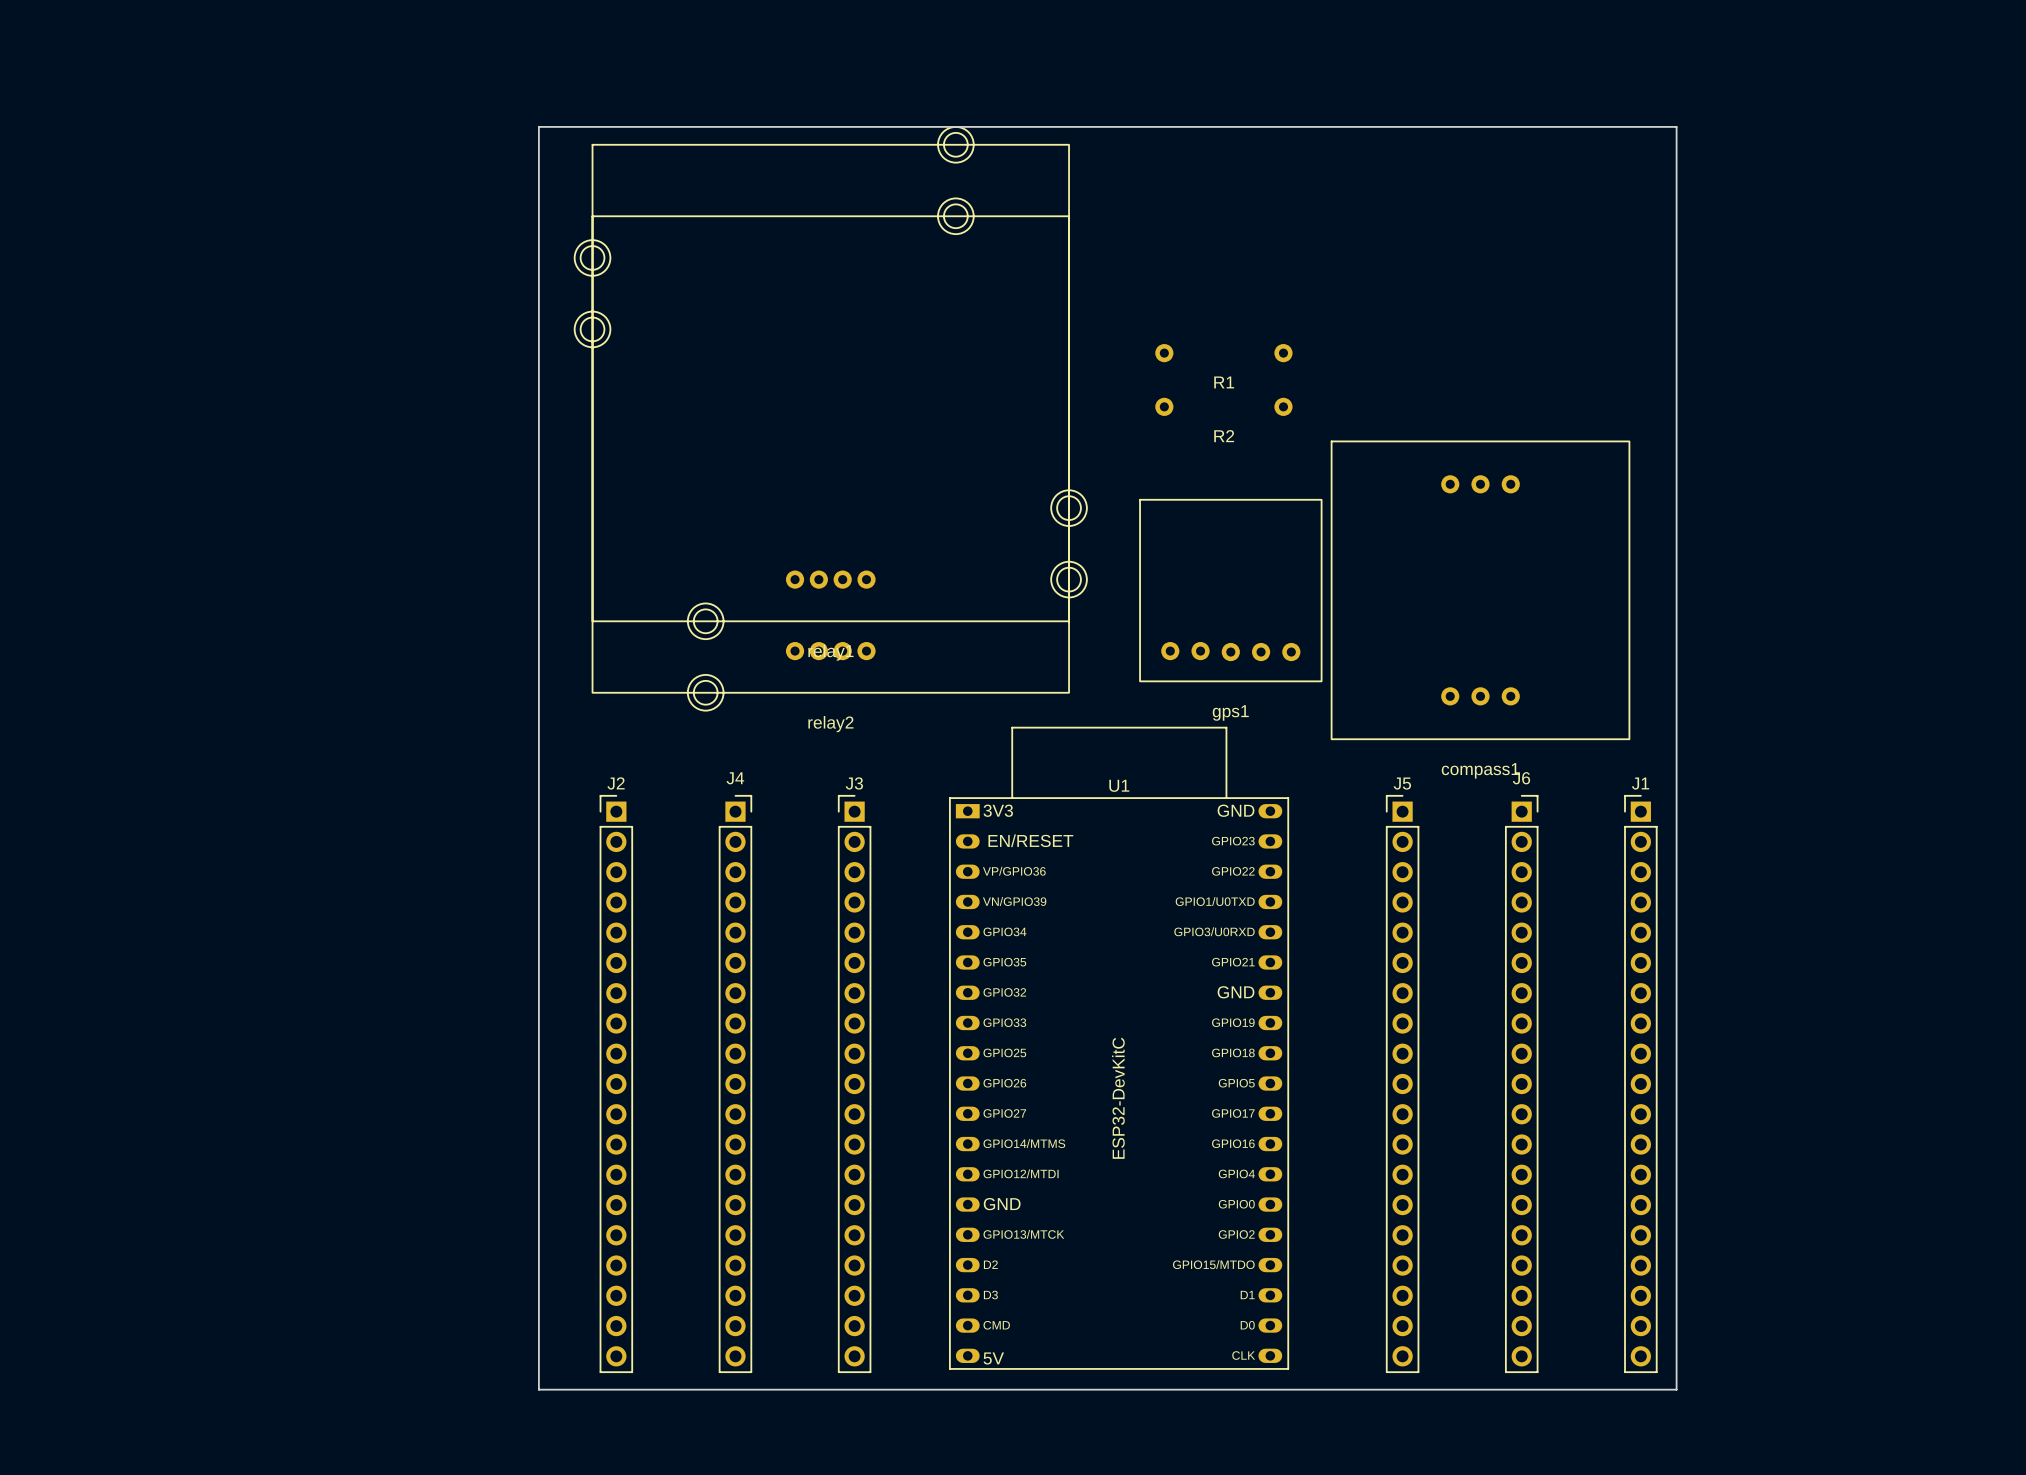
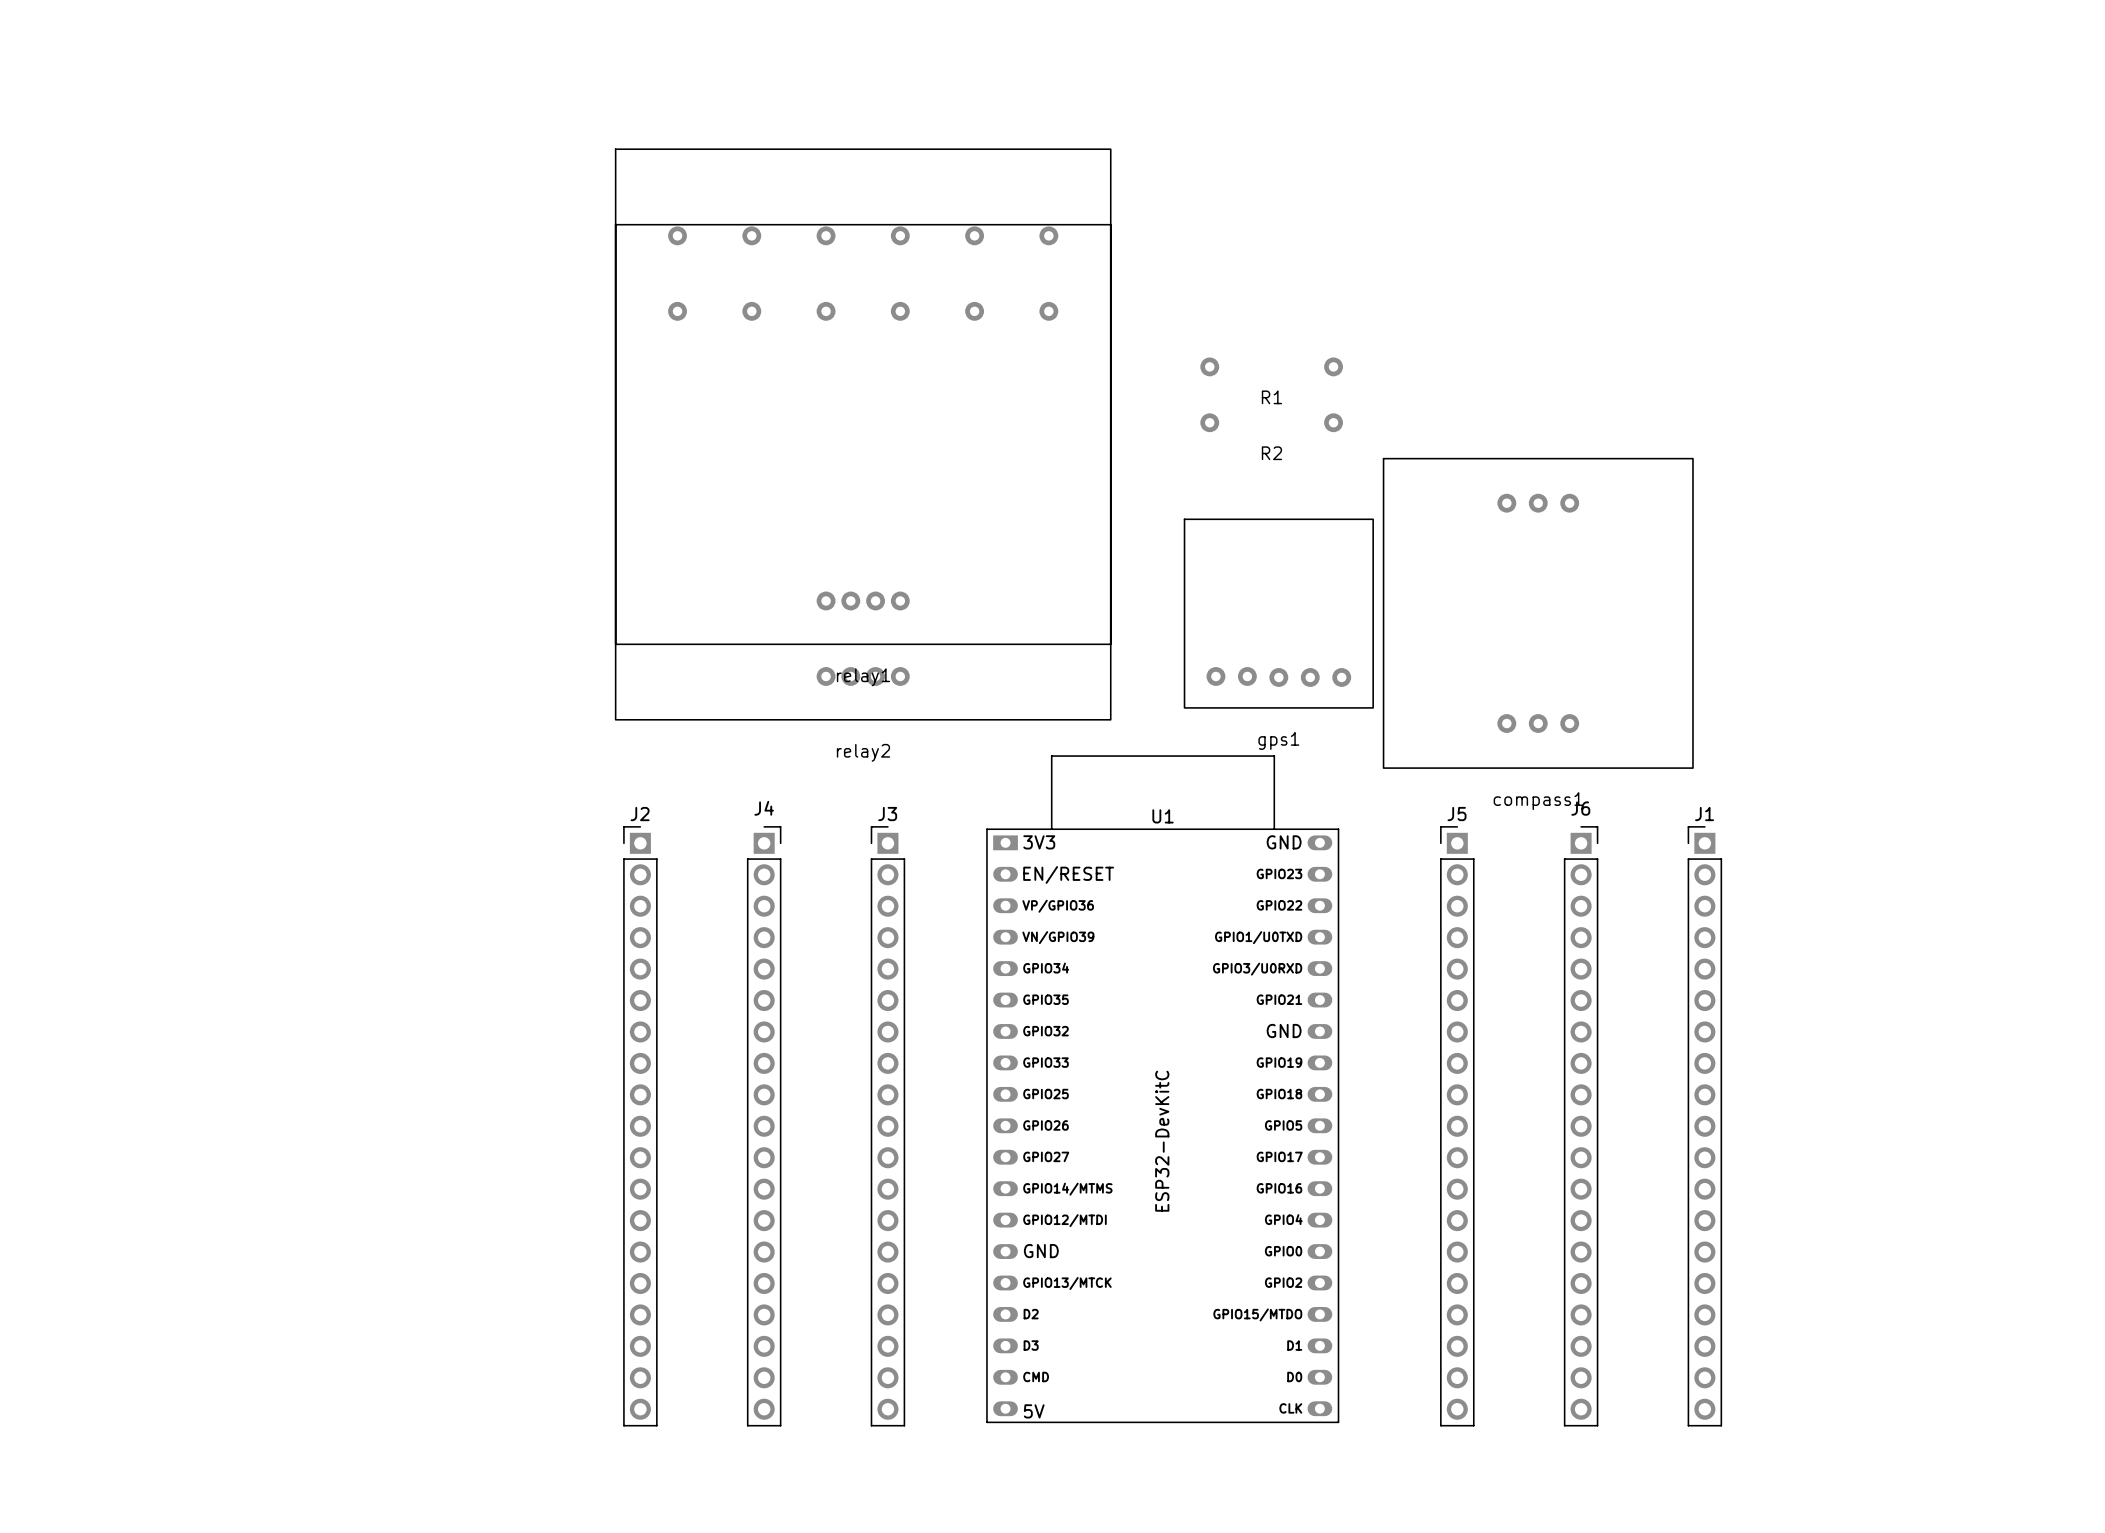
board edge: (538, 126) (1676, 126) (1676, 1389) (538, 1389) (538, 126) -> none
relay1 footprint: [574, 126, 1088, 640] -> [615, 148, 1112, 645]
relay2 footprint: [574, 197, 1088, 712] -> [615, 224, 1112, 721]

